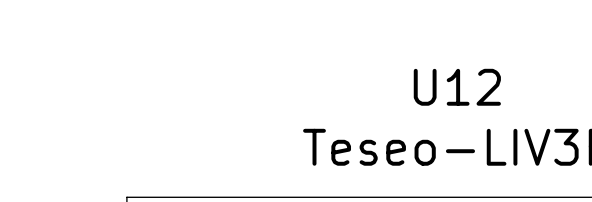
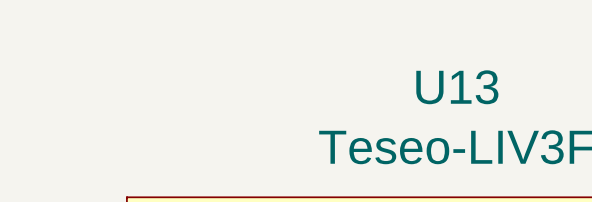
U12 name: U12 (457, 87) -> U13 (457, 87)

